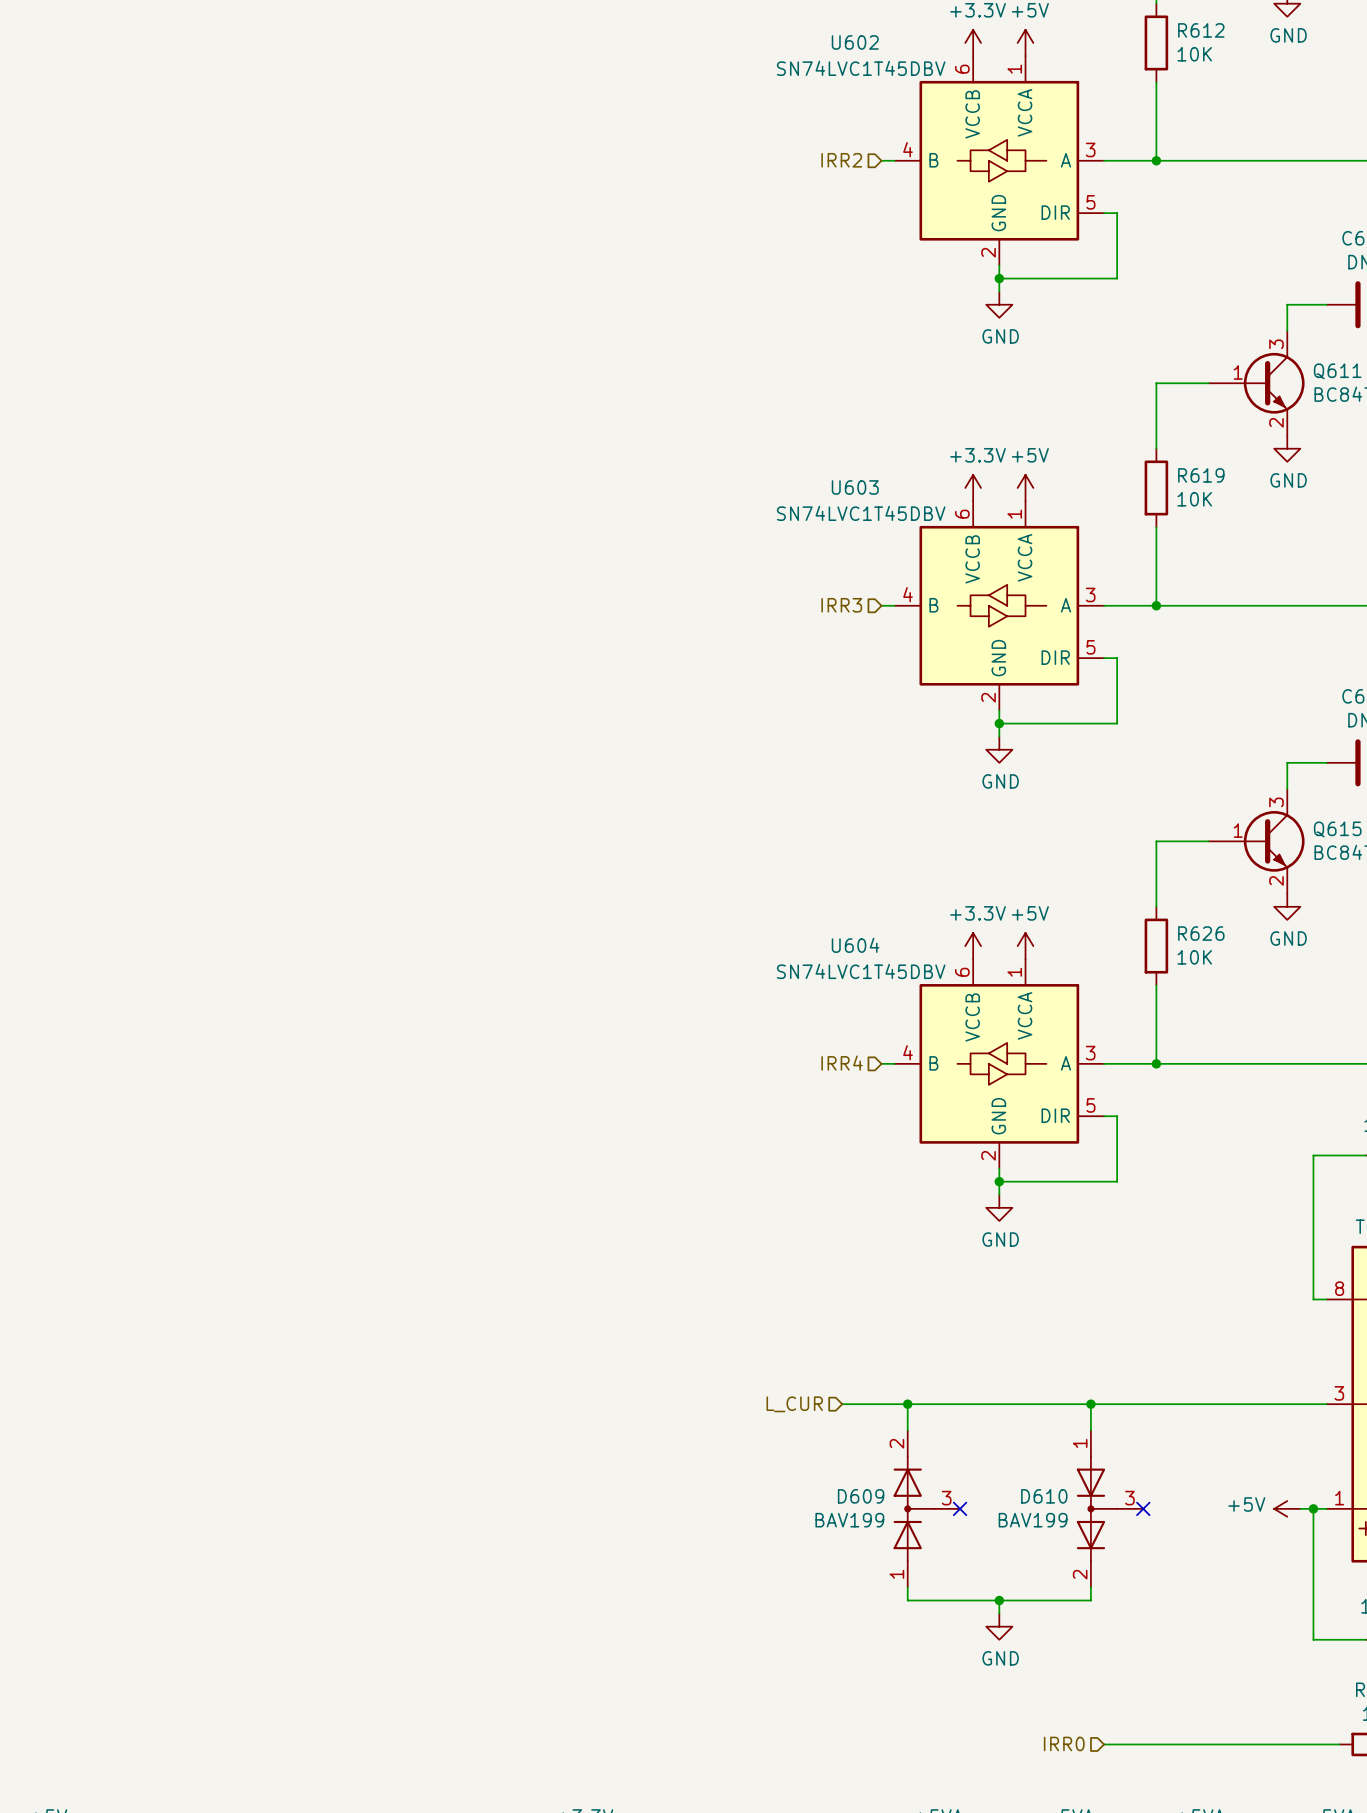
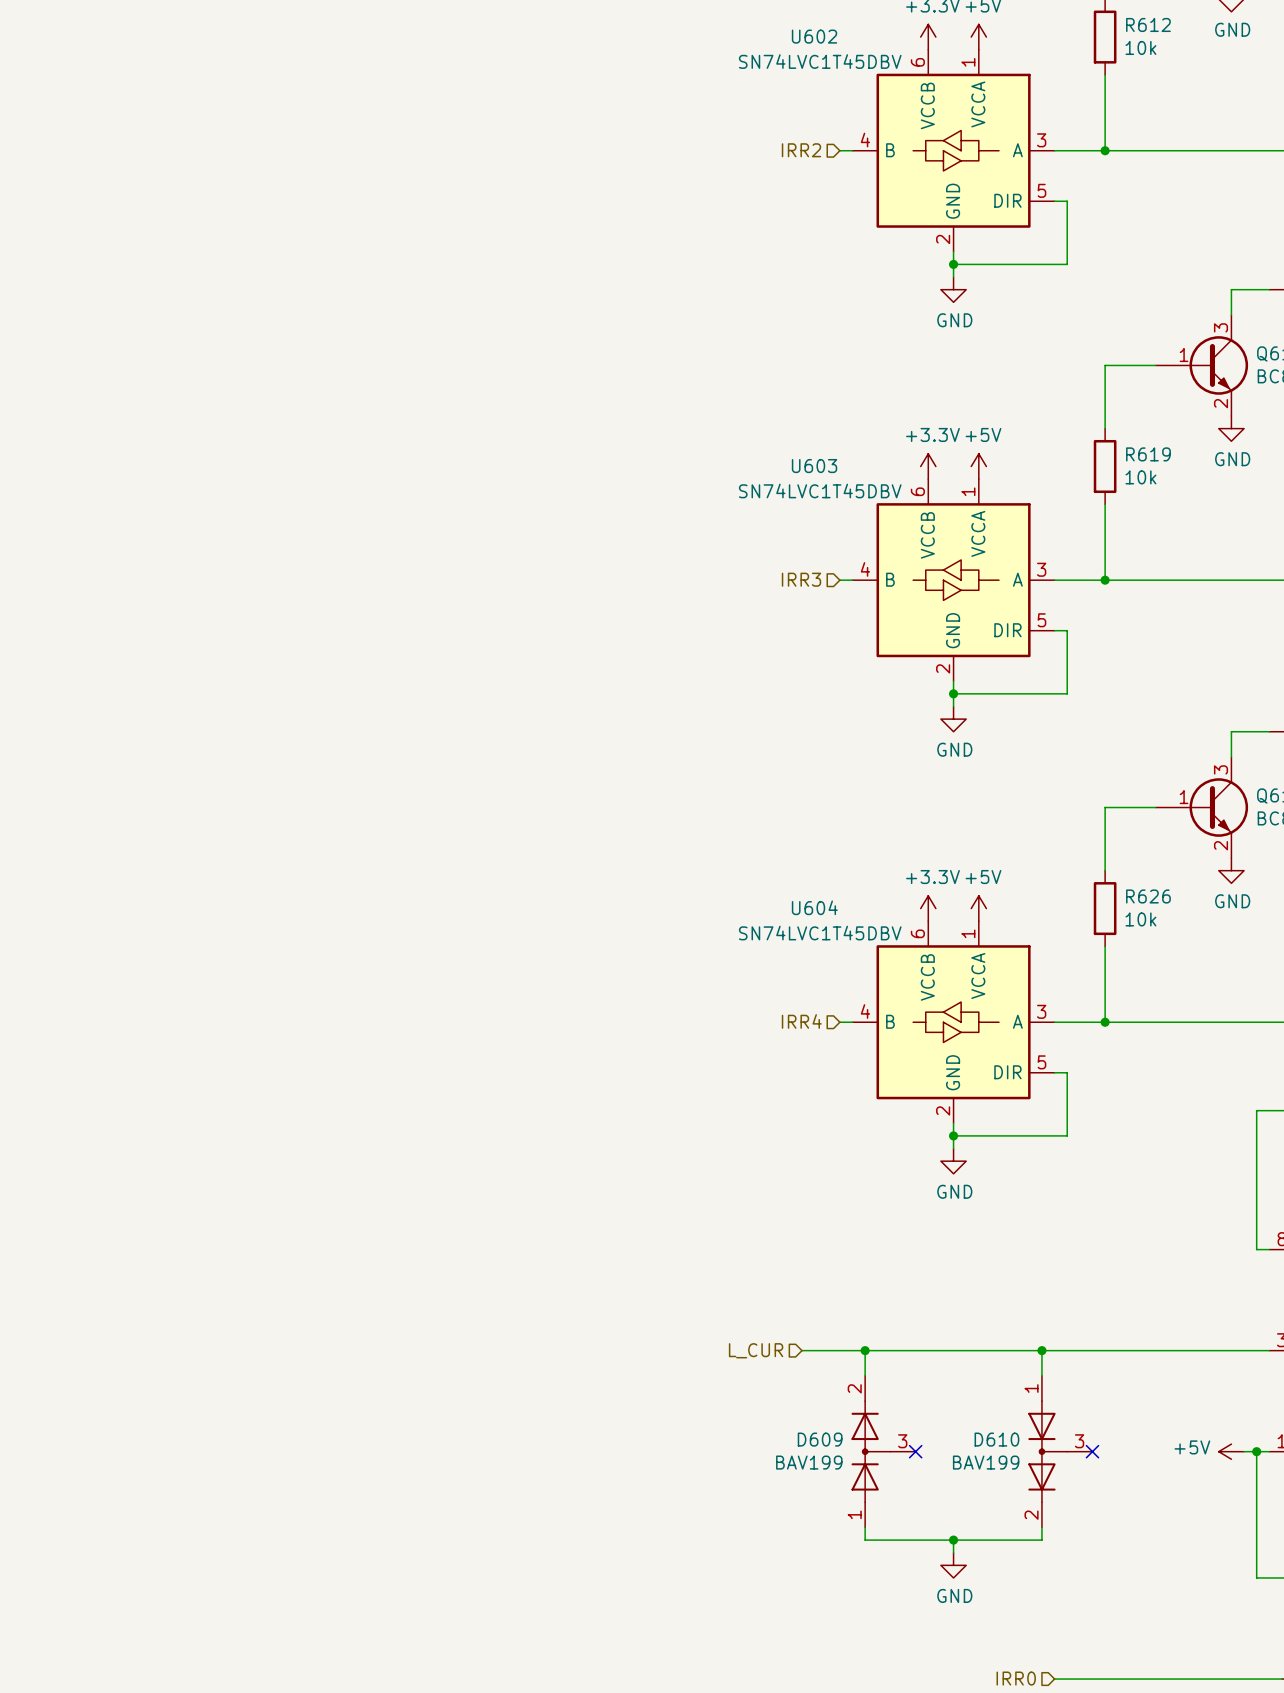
R612 value: 10K (1194, 54) -> 10k (1140, 47)
R619 value: 10K (1194, 499) -> 10k (1140, 477)
R626 value: 10K (1194, 957) -> 10k (1140, 919)

